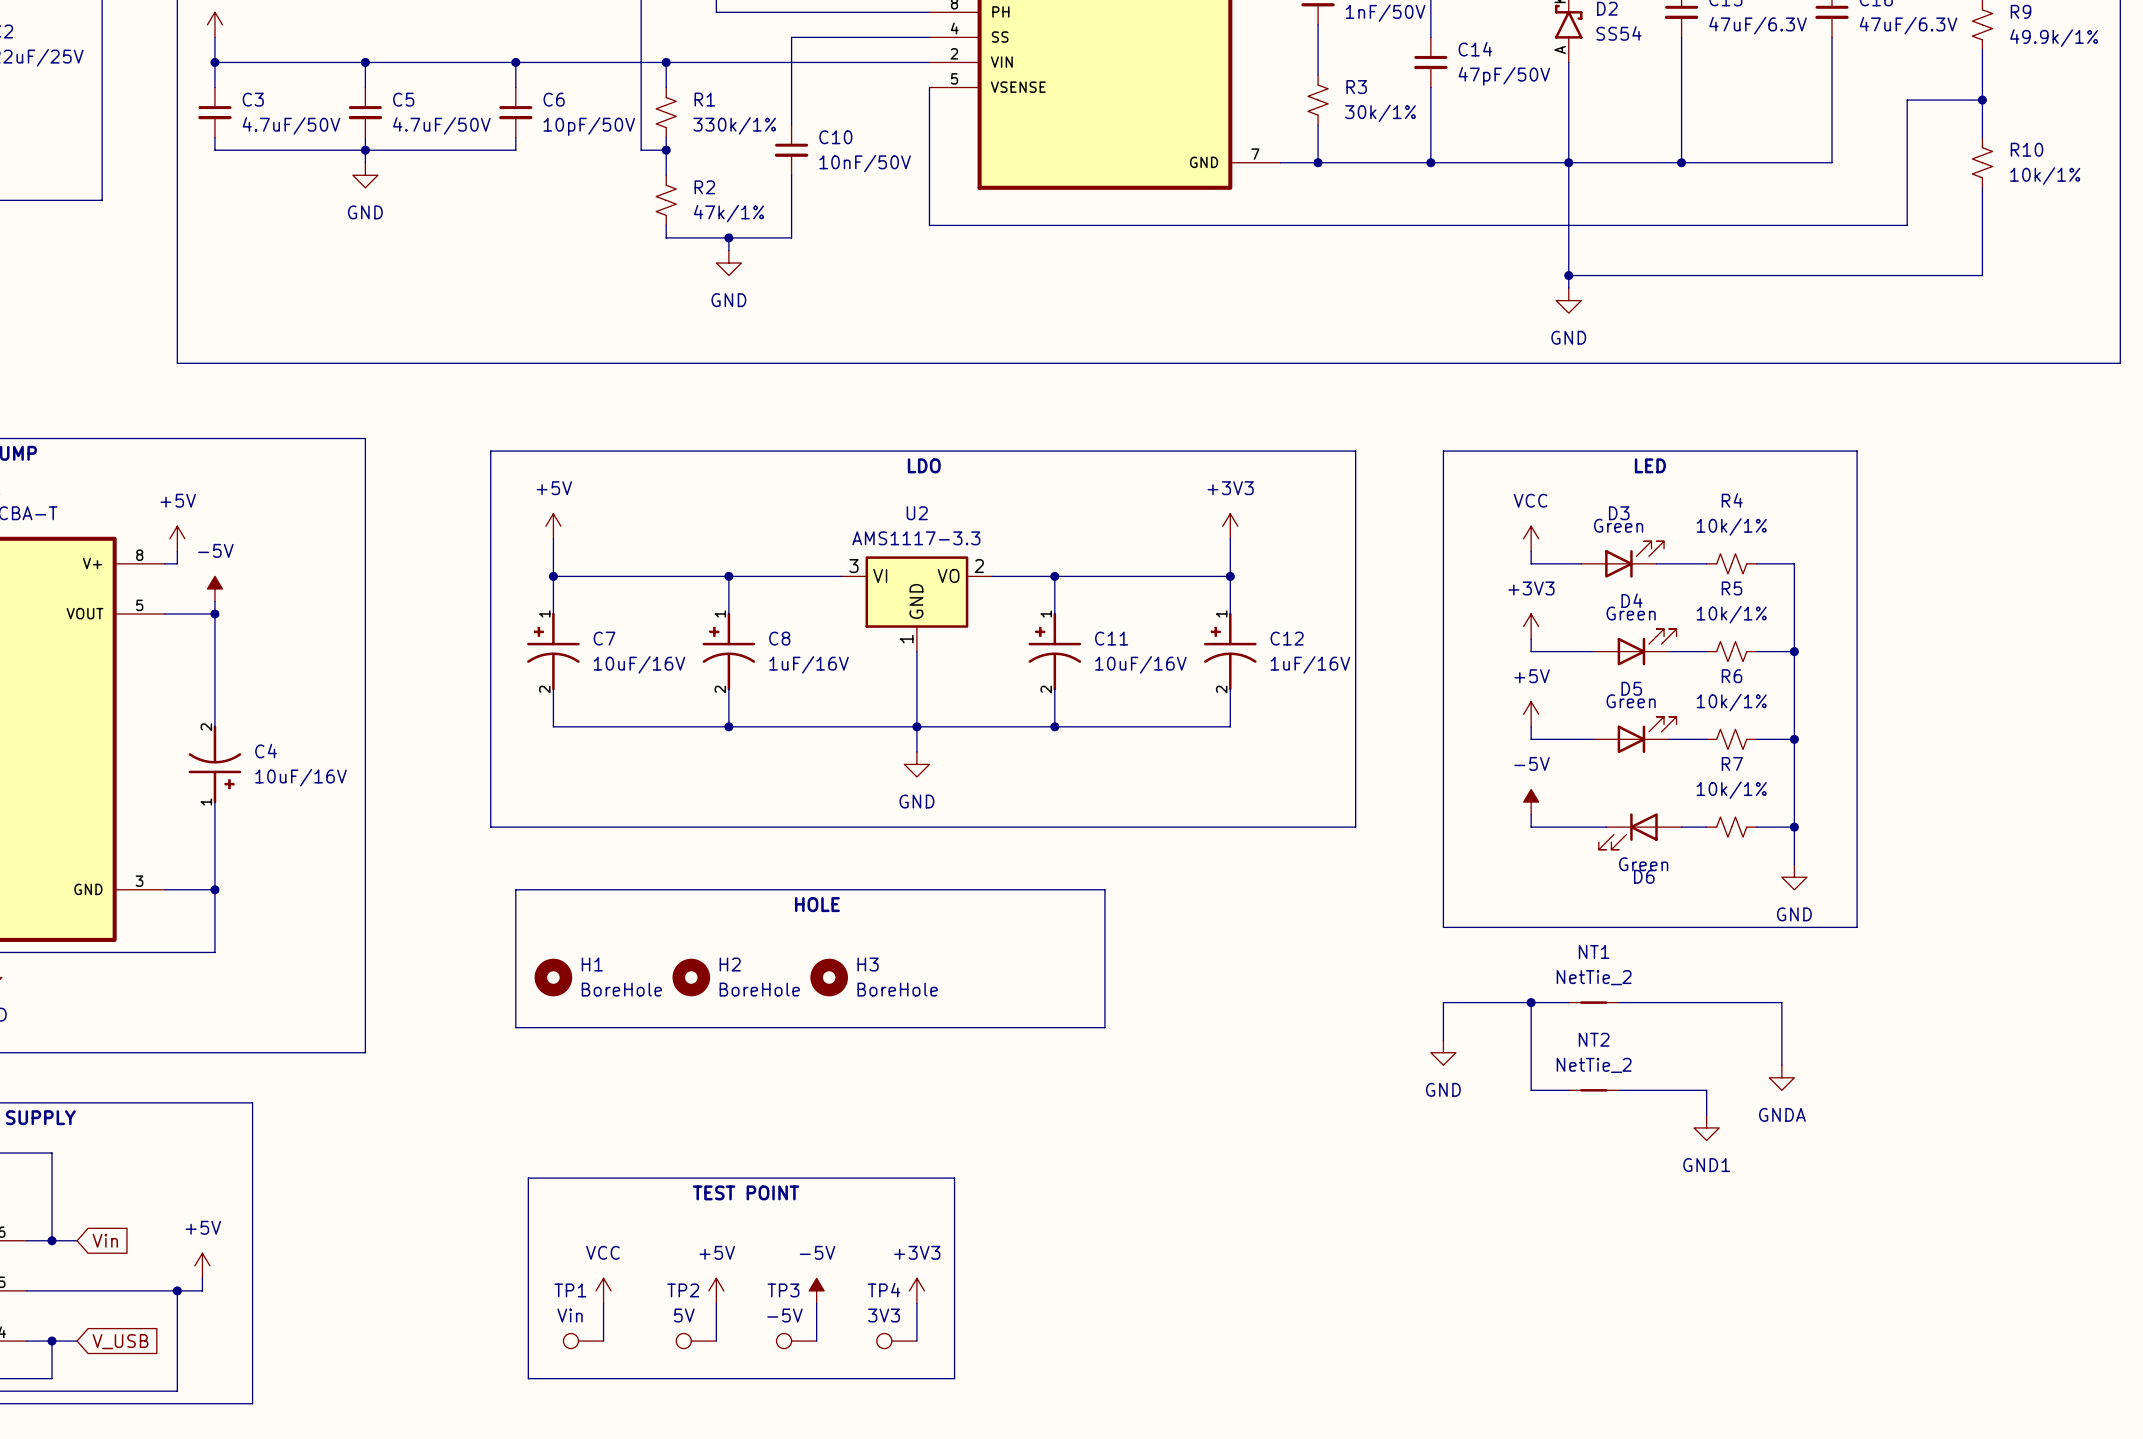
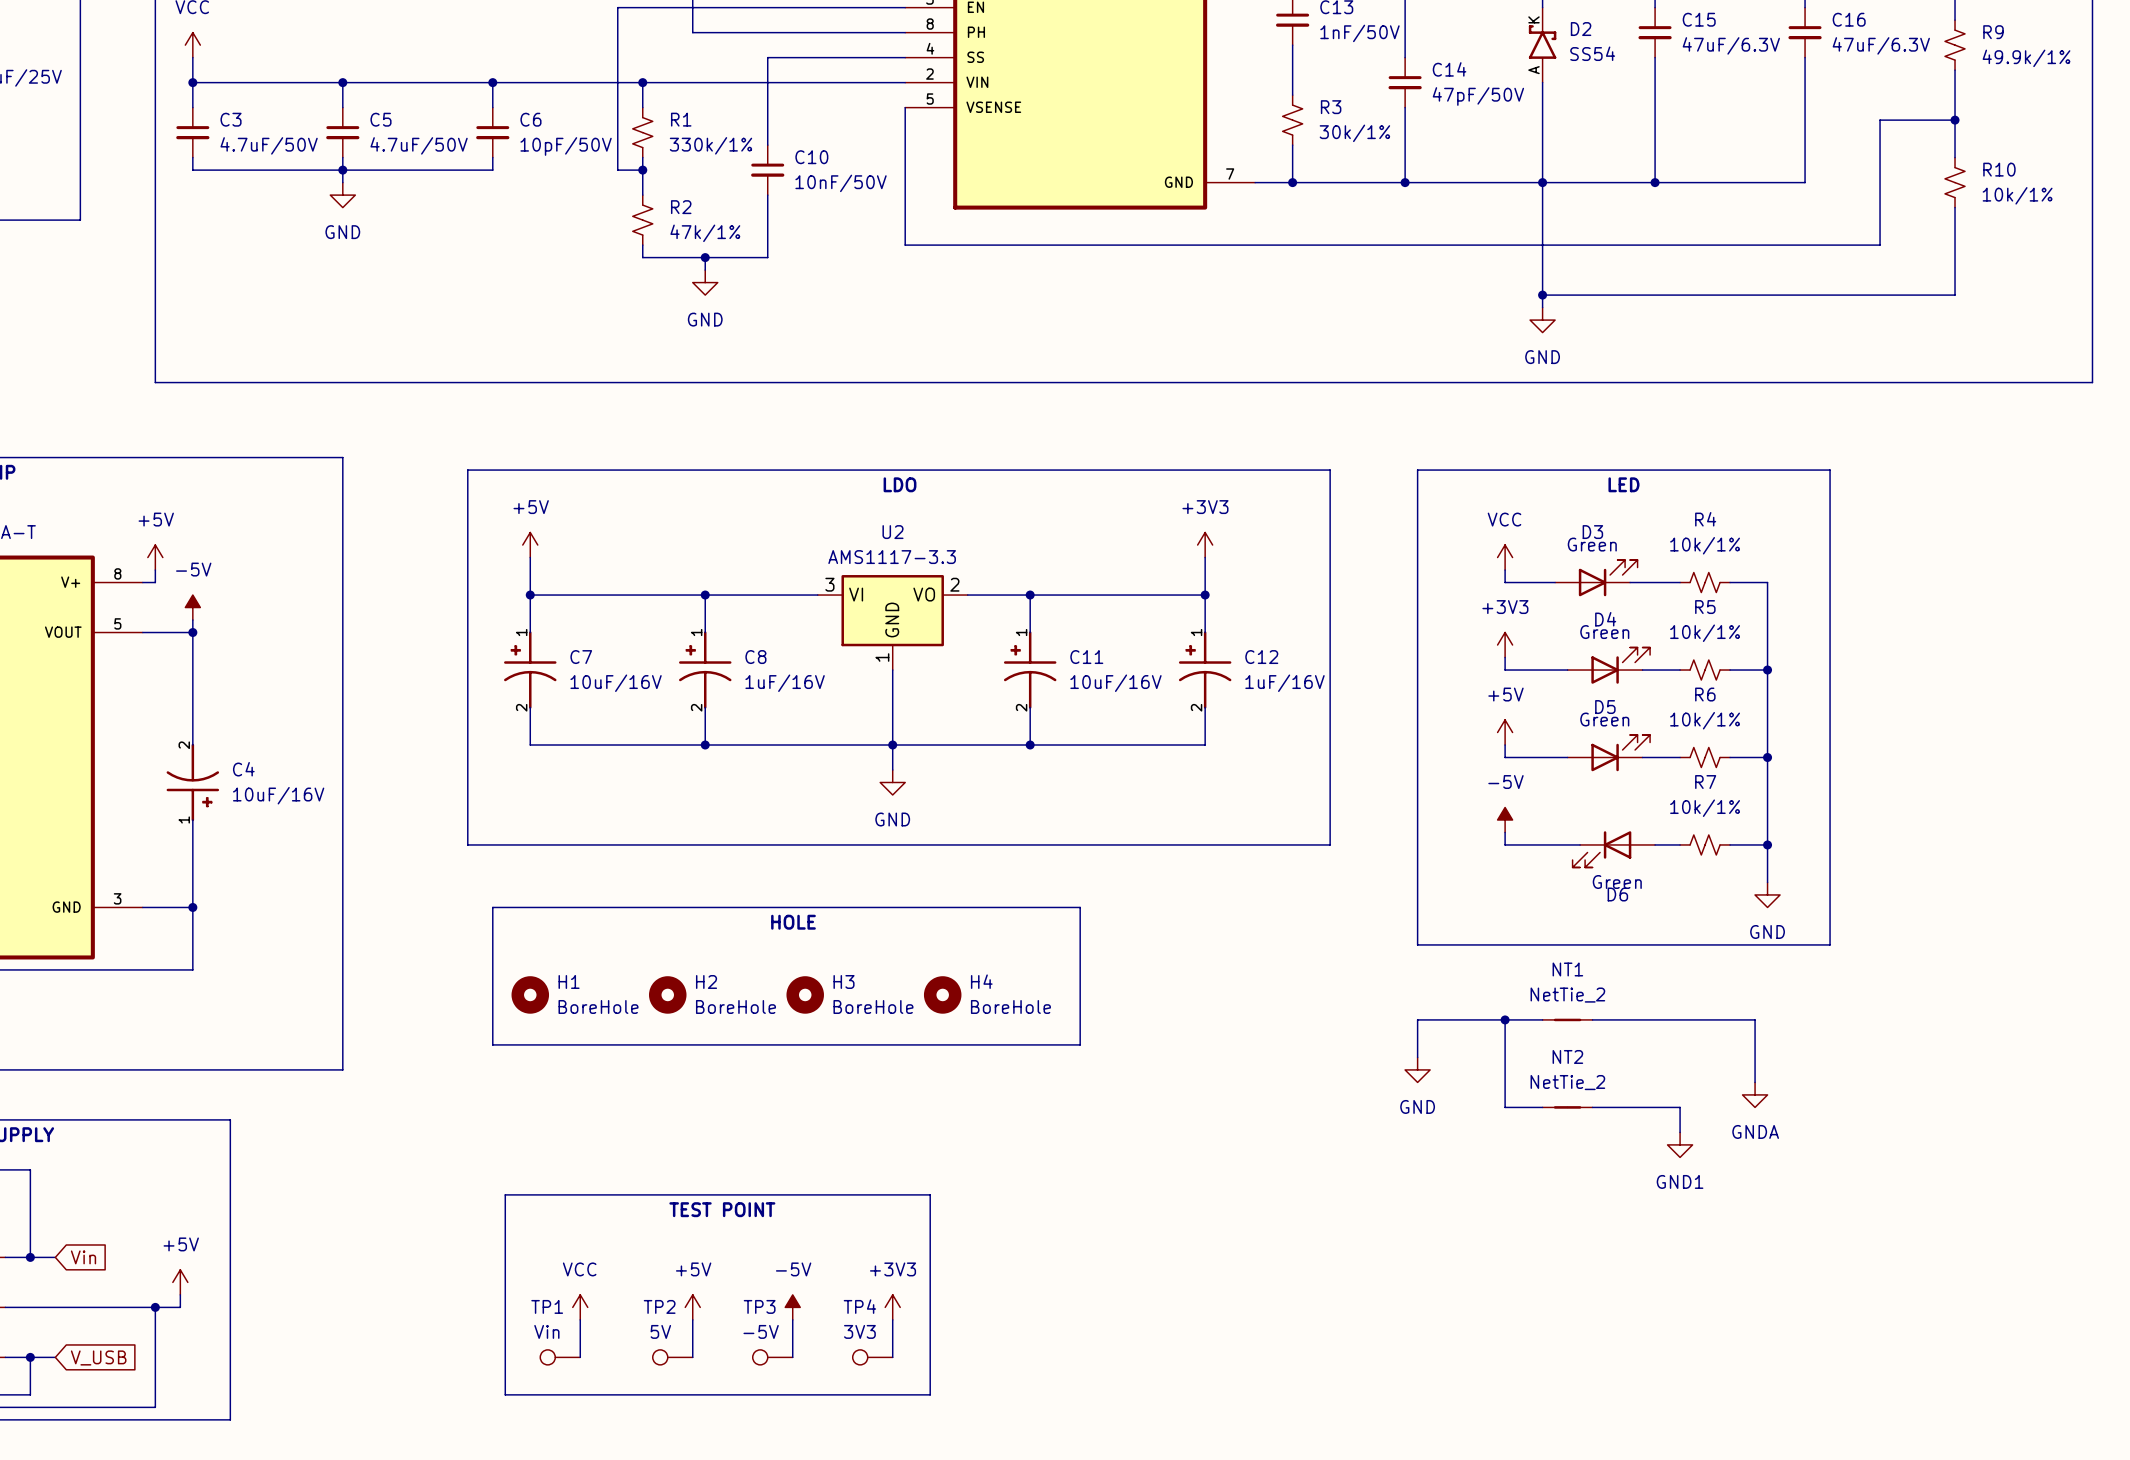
H4: none -> BoreHole (942, 994)

